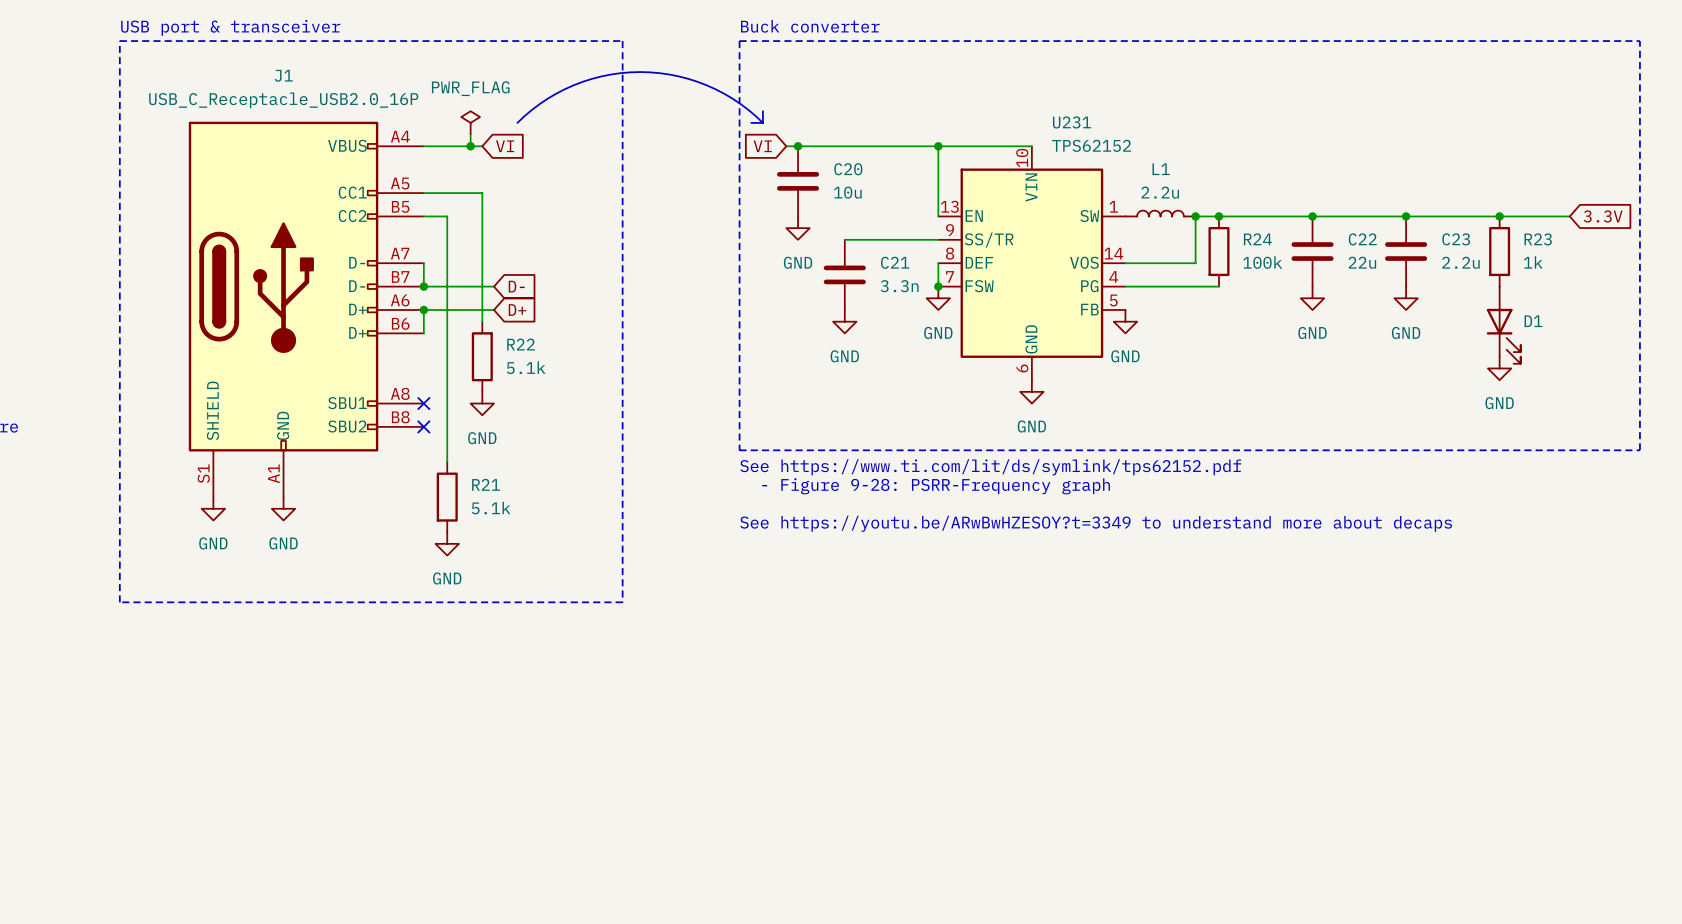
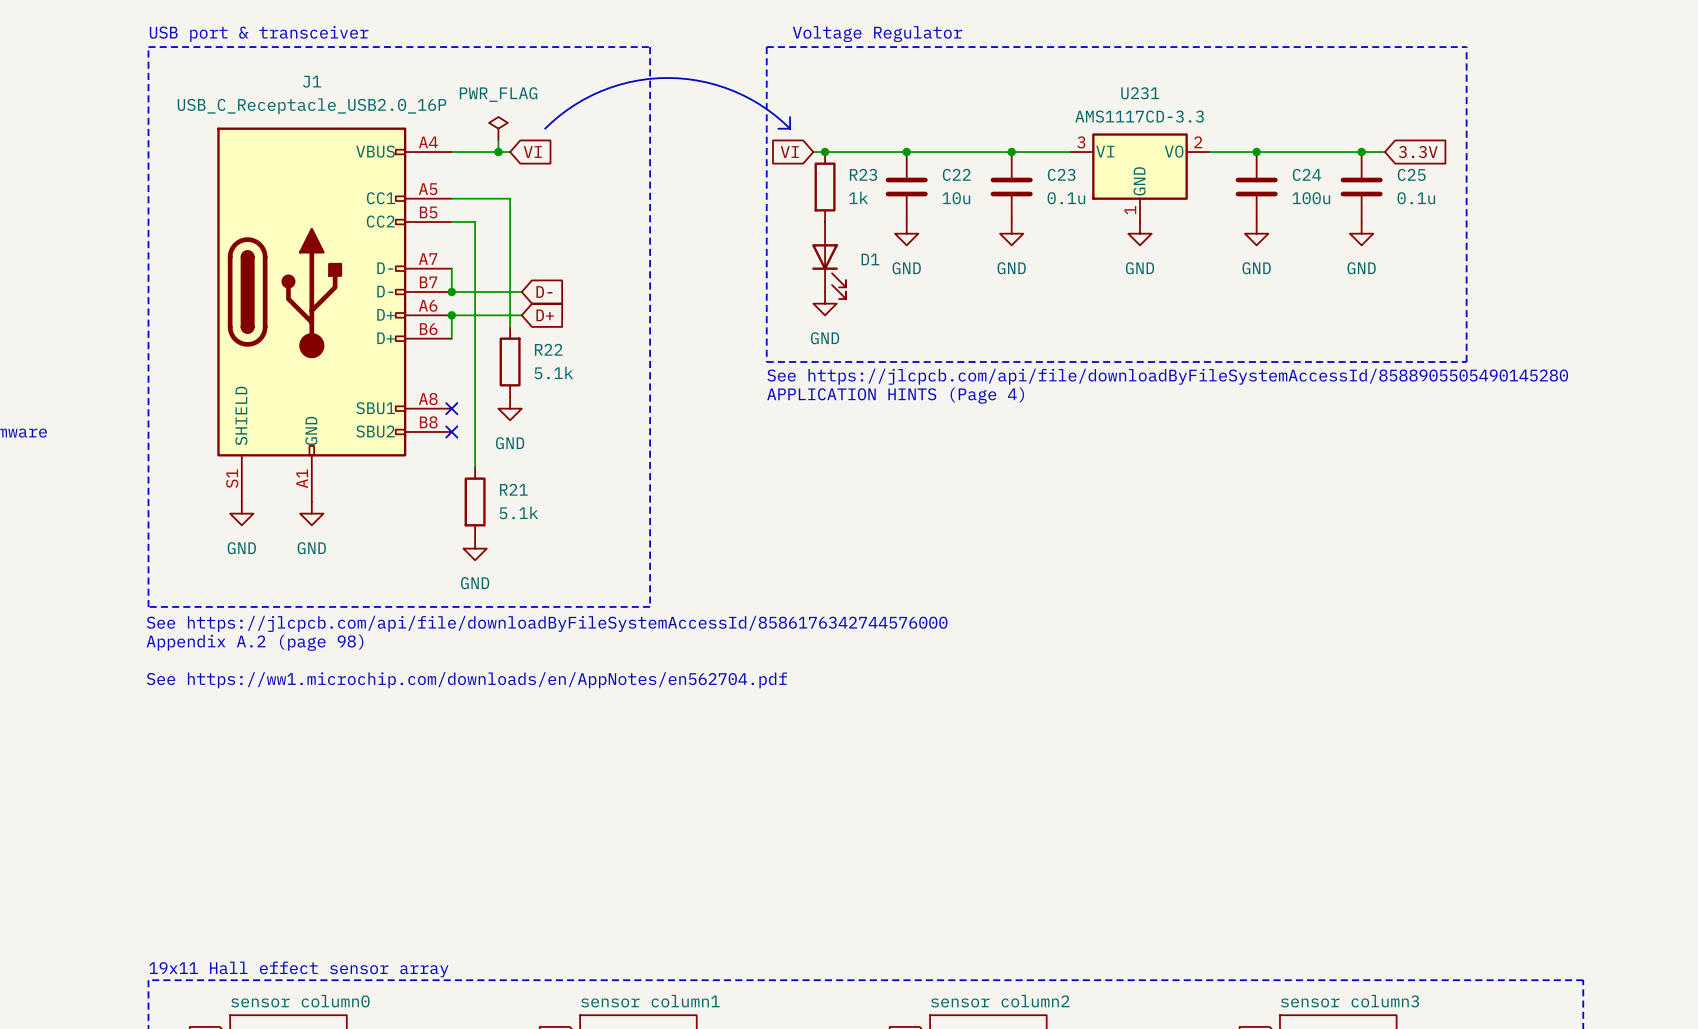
text: Buck converter (810, 26) -> none
text: none -> Voltage Regulator (877, 34)
line: (1441, 41) (1639, 41) (1639, 450) (739, 450) (739, 356) -> (1466, 47) (1466, 361) (766, 361)
U231 name position: U231 (1072, 122) -> U231 (1140, 93)
U231 value: TPS62152 (1091, 145) -> AMS1117CD-3.3 (1139, 116)
junction: none -> (906, 152)
wire: (938, 146) (938, 216) -> none
junction: (938, 146) -> none
U231 symbol: [938, 146, 1126, 381] -> [1070, 133, 1210, 223]
junction: none -> (1011, 152)
wire: none -> (1058, 152) (1070, 152)
wire: none -> (1209, 152) (1384, 152)
junction: none -> (1256, 152)
junction: none -> (1361, 152)
C20: 10u (798, 181) -> none
C24: none -> 100u (1256, 187)
C25: none -> 0.1u (1361, 187)
L1: 2.2u (1160, 213) -> none
junction: (1195, 216) -> none
junction: (1218, 216) -> none
junction: (1312, 216) -> none
junction: (1406, 216) -> none
junction: (1499, 216) -> none
wire: (1569, 216) (1195, 216) (1195, 263) (1125, 263) -> none
global label position: 3.3V (1603, 216) -> 3.3V (1418, 152)
power symbol: GND (798, 228) -> none
power symbol: none -> GND (906, 233)
power symbol: none -> GND (1011, 233)
power symbol: none -> GND (1140, 233)
power symbol: none -> GND (1256, 233)
power symbol: none -> GND (1361, 233)
wire: (844, 239) (938, 239) -> none
R24: 100k (1218, 251) -> none
C22 position: (1312, 251) -> (906, 187)
C23 position: (1406, 251) -> (1011, 187)
R23 position: (1499, 251) -> (825, 187)
C22 value: 22u (1362, 262) -> 10u (956, 198)
C23 value: 2.2u (1460, 262) -> 0.1u (1066, 198)
wire: (938, 263) (938, 286) -> none
C21: 3.3n (844, 274) -> none
junction: (938, 286) -> none
wire: (1125, 286) (1218, 286) -> none
power symbol: none -> GND (825, 303)
power symbol: GND (938, 298) -> none
power symbol: GND (1312, 298) -> none
power symbol: GND (1406, 298) -> none
power symbol: GND (844, 321) -> none
power symbol: GND (1125, 321) -> none
D1 name position: D1 (1533, 321) -> D1 (870, 259)
D1 position: (1503, 325) -> (829, 260)
power symbol: GND (1499, 368) -> none
text: none -> See https://jlcpcb.com/api/file/downloadByFileSystemAccessId/8588905505490145280 (1167, 376)
text: none -> APPLICATION HINTS (Page 4) (895, 395)
power symbol: GND (1031, 391) -> none
text: See https://www.ti.com/lit/ds/symlink/tps62152.pdf (990, 467) -> none
text: - Figure 9-28: PSRR-Frequency graph (936, 486) -> none
text: See https://youtu.be/ARwBwHZESOY?t=3349 to understand more about decaps (1096, 523) -> none
text: none -> See https://jlcpcb.com/api/file/downloadByFileSystemAccessId/8586176342744576000 (547, 623)
text: none -> Appendix A.2 (page 98) (255, 642)
text: none -> See https://ww1.microchip.com/downloads/en/AppNotes/en562704.pdf (466, 680)

